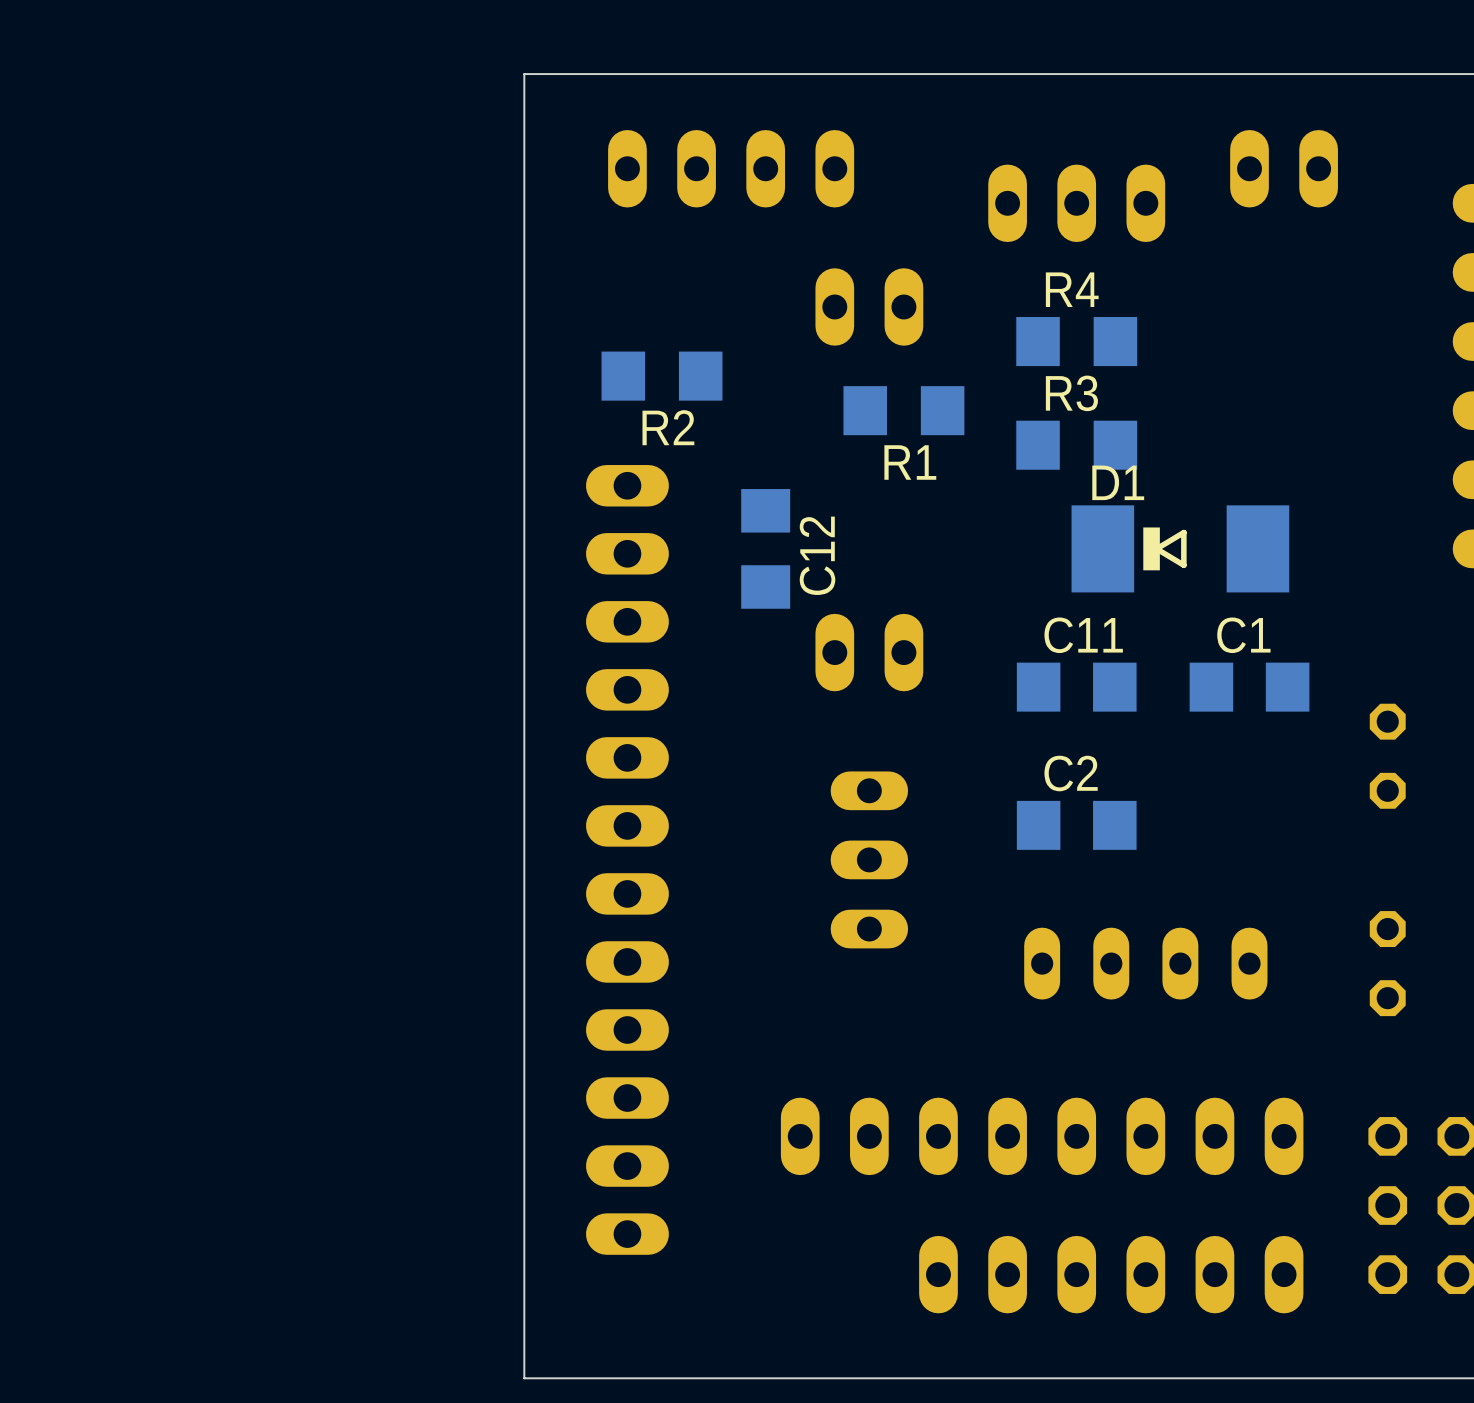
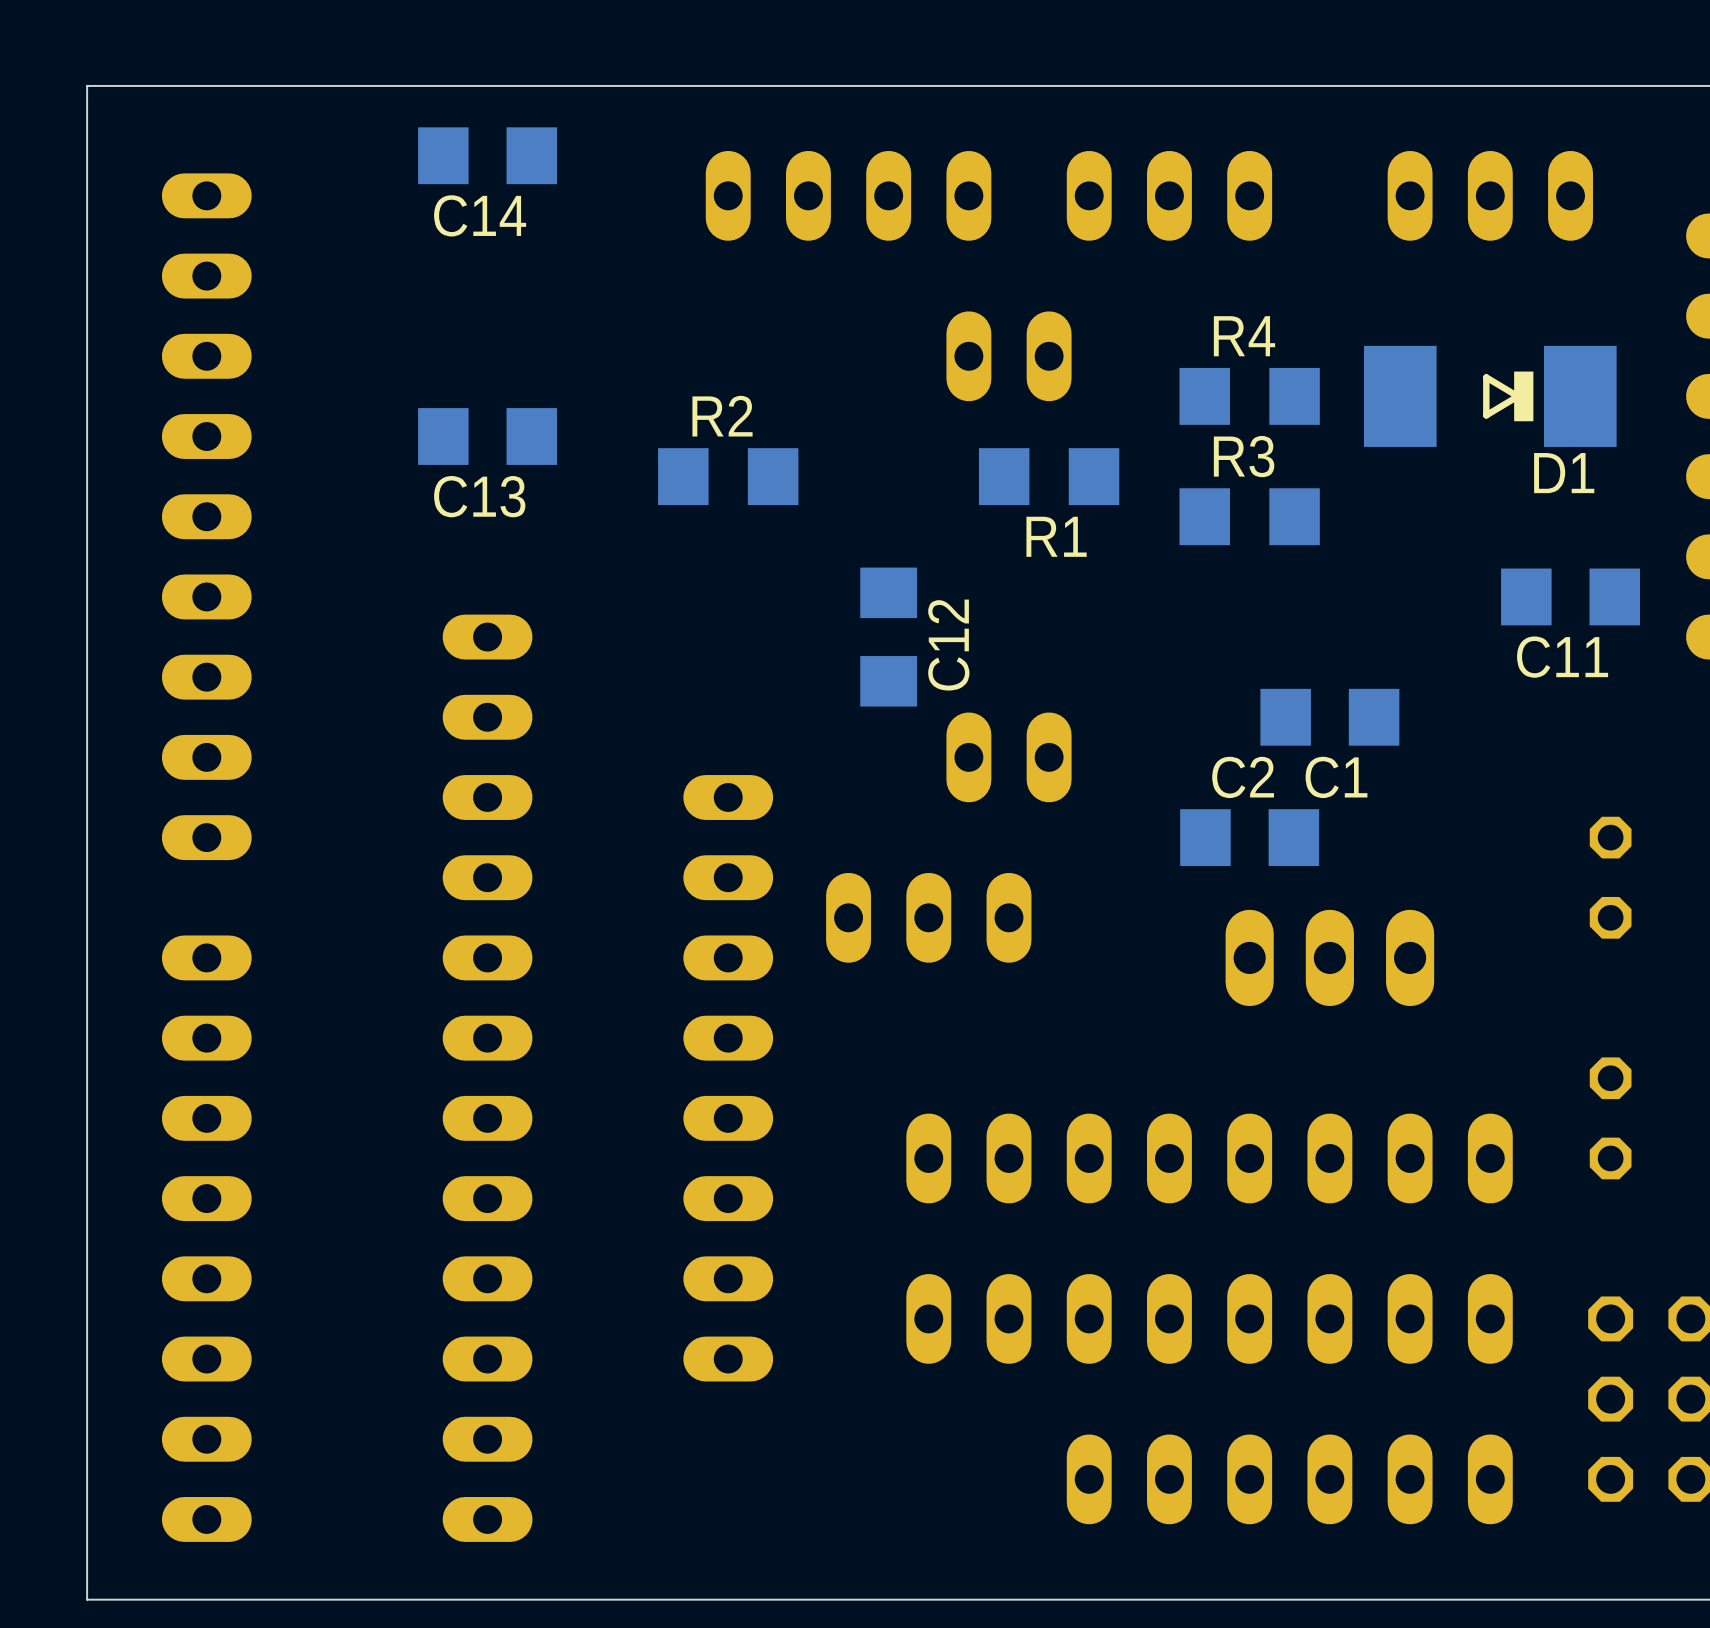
board edge: (524, 74) (524, 1378) -> (608, 85) (87, 85) (87, 1599) (608, 1599)
part footprint: [1230, 130, 1338, 208] -> [1387, 150, 1593, 241]
C14: none -> (487, 155)
part position: (1076, 203) -> (1169, 195)
part: none -> (206, 276)
C13: none -> (487, 436)
R2 position: (662, 376) -> (728, 476)
R2 name position: R2 (668, 427) -> R2 (722, 416)
part: none -> (206, 516)
D1 rotation: 0° (1180, 548) -> 180° (1490, 396)
D1 position: (1180, 548) -> (1490, 396)
C11 name position: C11 (1083, 635) -> C11 (1562, 657)
C1 name position: C1 (1243, 635) -> C1 (1336, 777)
part: none -> (206, 757)
part: none -> (487, 757)
C11 position: (1076, 687) -> (1570, 596)
C1 position: (1249, 687) -> (1329, 717)
part: none -> (728, 917)
C2 position: (1076, 825) -> (1249, 837)
part: none -> (1329, 957)
part: (627, 859) -> none
part rotation: 0° (869, 859) -> 90° clockwise (928, 917)
part: none -> (206, 1078)
part: none -> (487, 1078)
part: (1145, 963) -> none
part: none -> (1049, 1158)
part: none -> (1369, 1158)
part: none -> (728, 1238)
part: none -> (206, 1399)
part: none -> (487, 1399)

